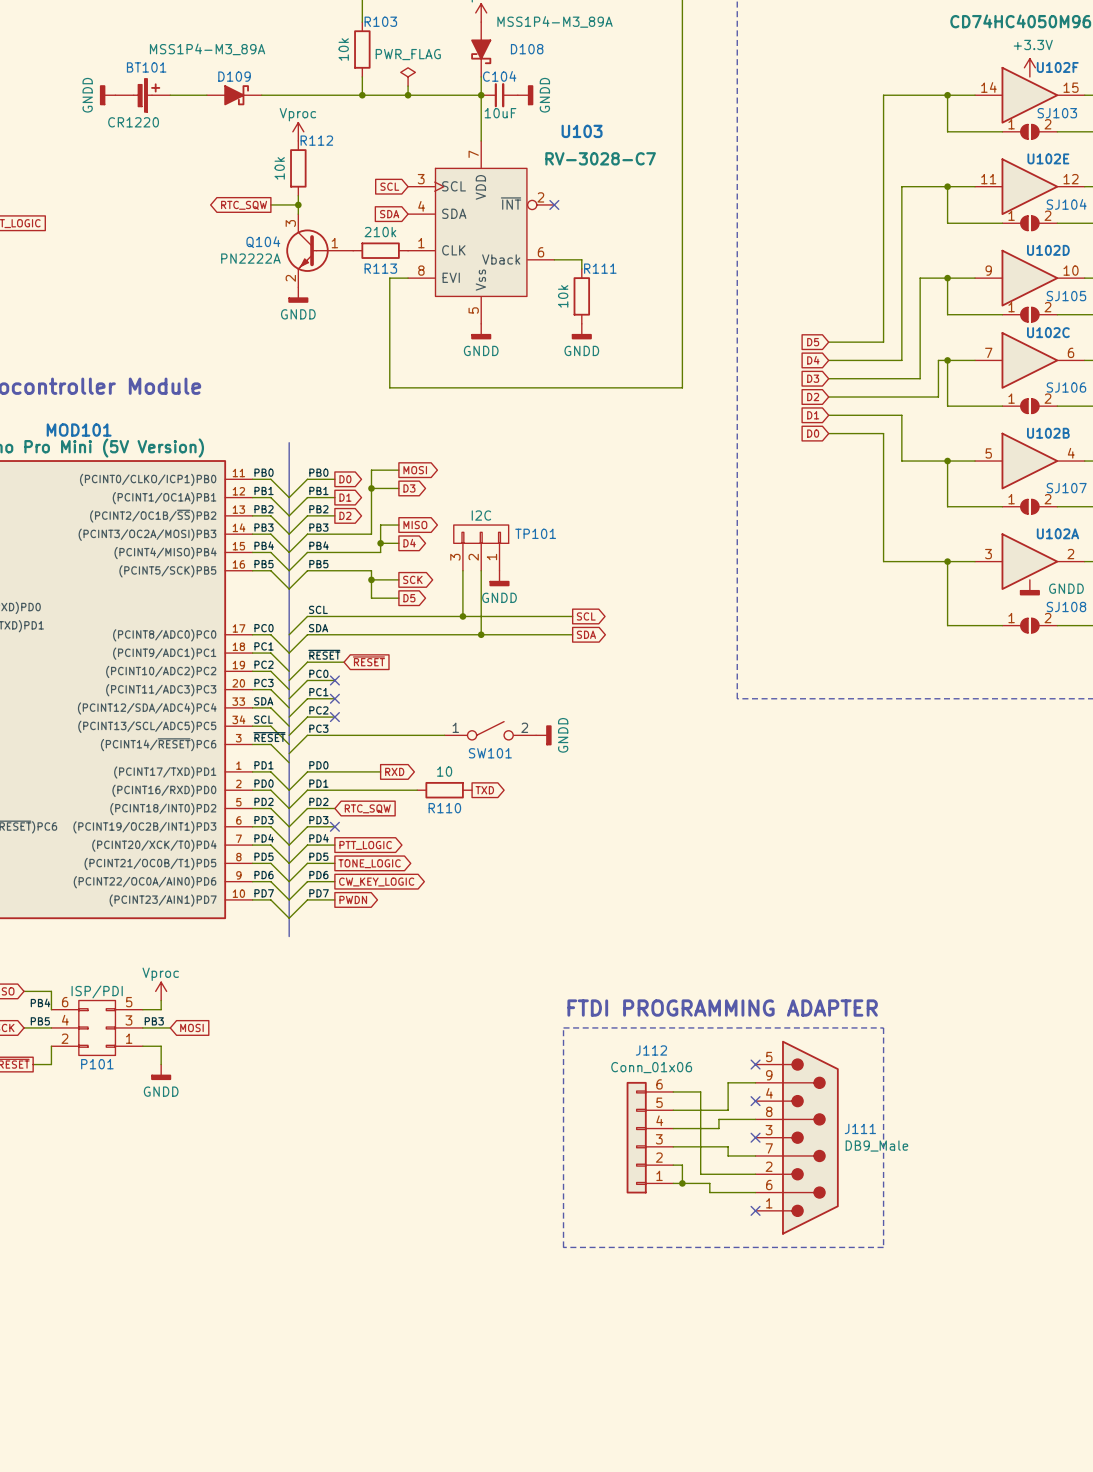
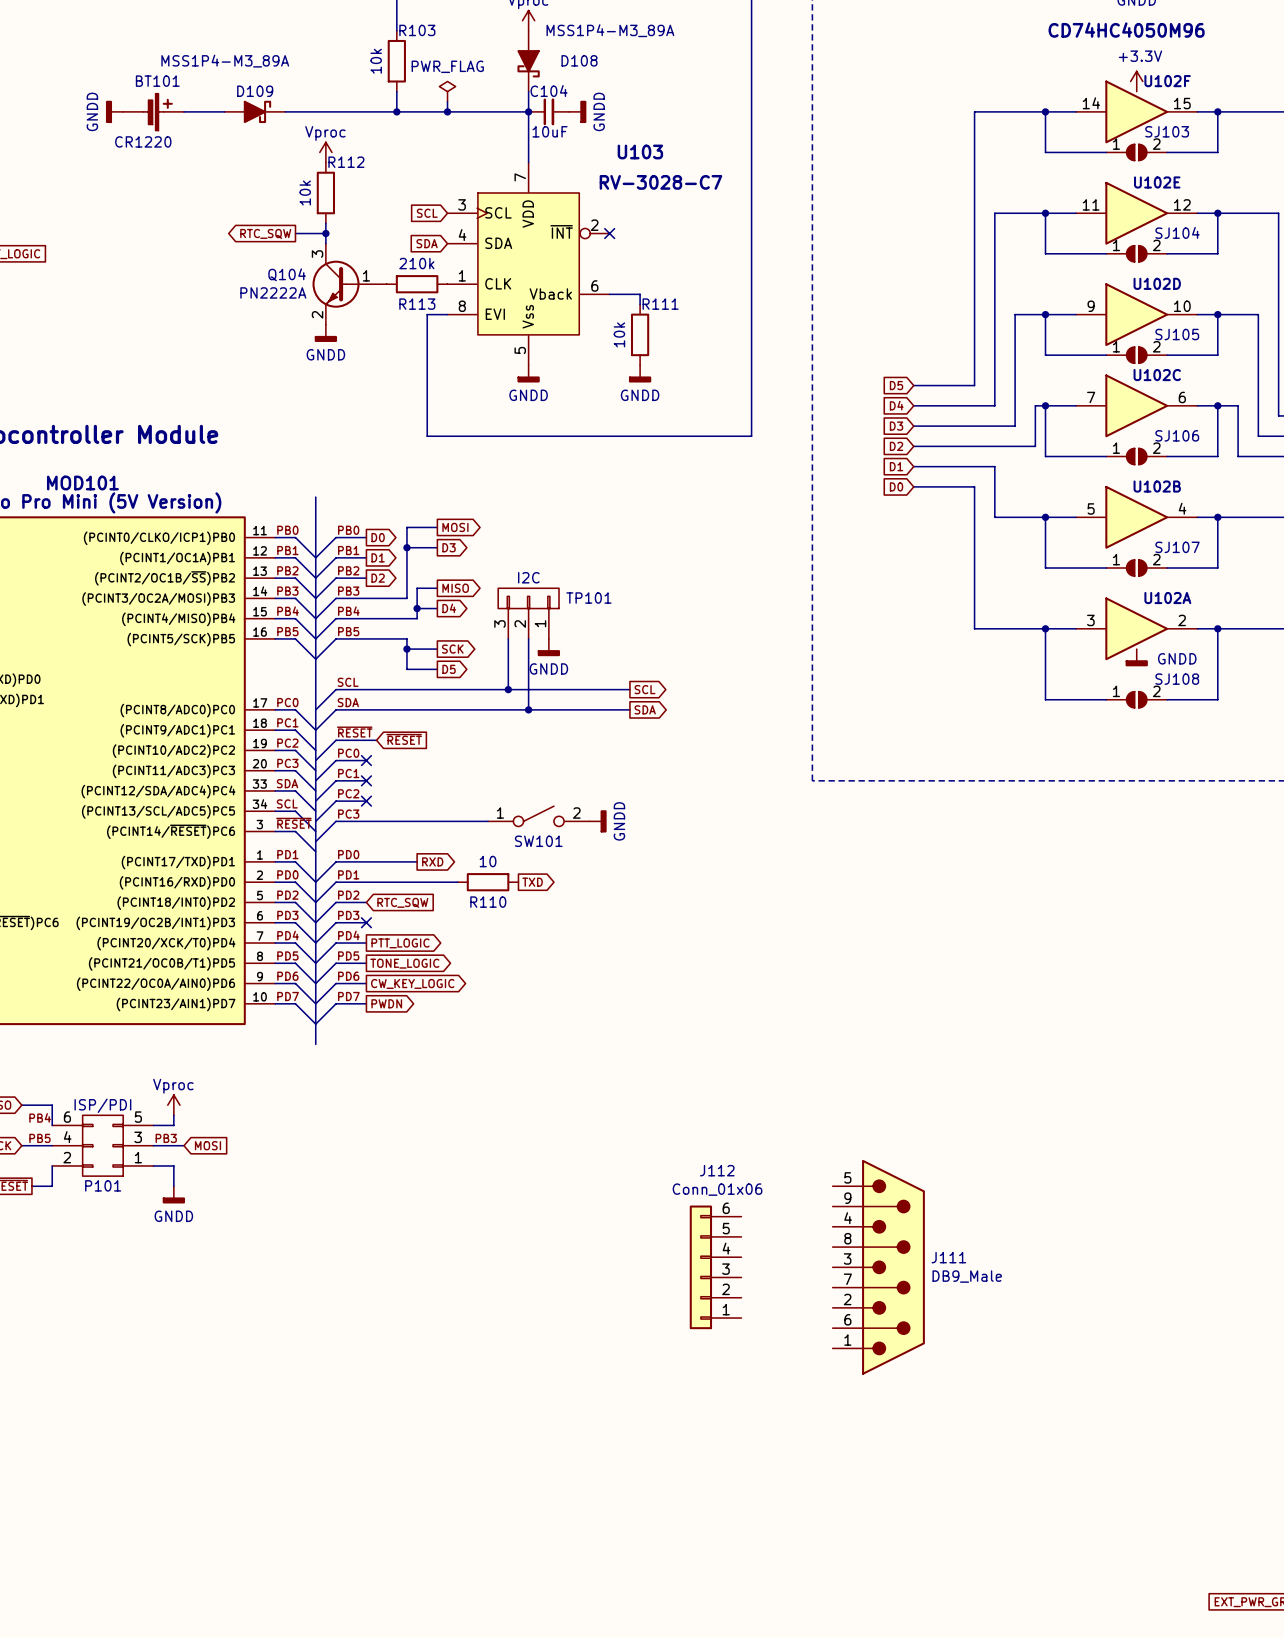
text: FTDI PROGRAMMING ADAPTER (722, 1008) -> none
line: (563, 1027) (883, 1027) (883, 1247) (563, 1247) (563, 1027) -> none
no-connect mark: (755, 1064) -> none
wire: (755, 1082) (728, 1082) (728, 1110) (673, 1110) -> none
wire: (673, 1091) (700, 1091) (700, 1174) (755, 1174) -> none
no-connect mark: (755, 1101) -> none
wire: (755, 1119) (718, 1119) (718, 1128) (673, 1128) -> none
no-connect mark: (755, 1137) -> none
wire: (673, 1146) (728, 1146) (728, 1155) (755, 1155) -> none
wire: (673, 1165) (682, 1165) (682, 1183) -> none
wire: (673, 1183) (709, 1183) (709, 1192) (755, 1192) -> none
junction: (682, 1183) -> none
no-connect mark: (755, 1210) -> none

